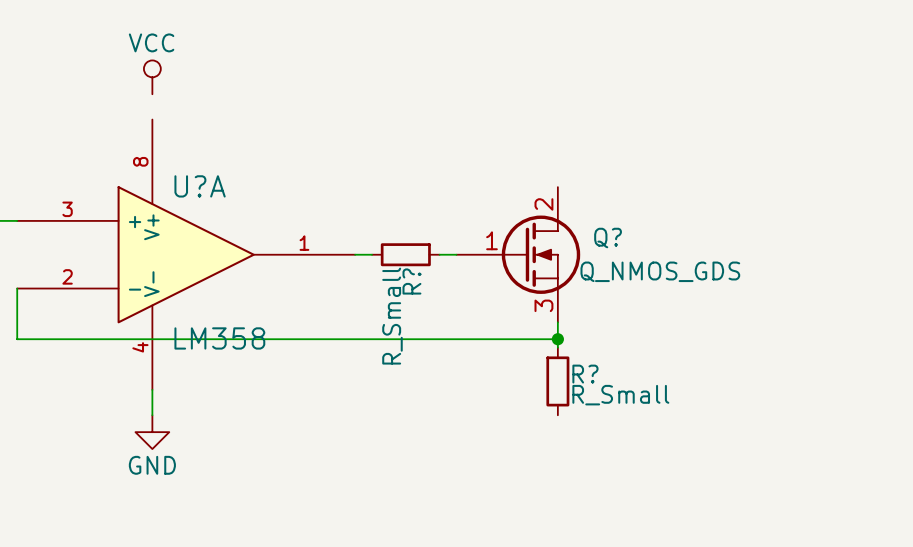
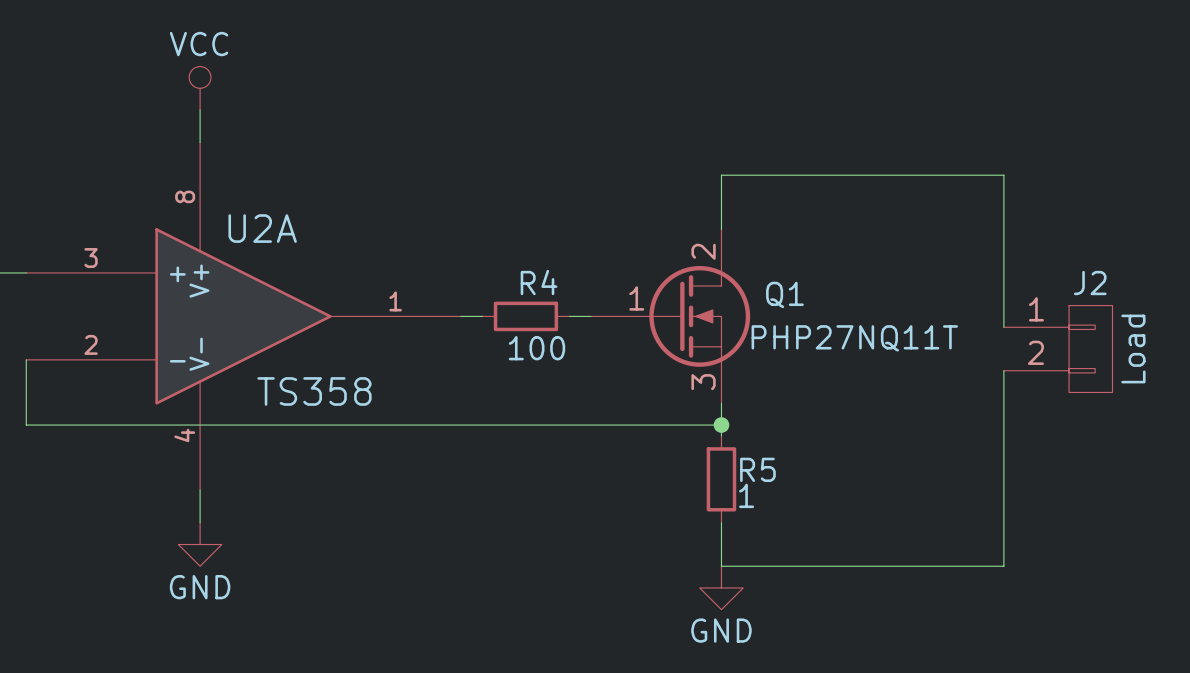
wire: none -> (200, 110) (200, 142)
U?A name: U?A (200, 186) -> U2A (262, 228)
wire: none -> (721, 229) (721, 175) (1003, 175) (1003, 327)
Q? name: Q? (608, 238) -> Q1 (784, 294)
Q? value: Q_NMOS_GDS (660, 271) -> PHP27NQ11T (854, 338)
J2: none -> Load (1058, 349)
R? name: R? (411, 281) -> R4 (539, 282)
wire: none -> (1003, 370) (1003, 566) (721, 566) (721, 522)
R? value: R_Small (392, 316) -> 100 (536, 348)
U?A value: LM358 (219, 338) -> TS358 (314, 391)
R? name: R? (585, 374) -> R5 (757, 469)
R? value: R_Small (620, 395) -> 1 (746, 495)
power symbol: none -> GND (721, 587)

